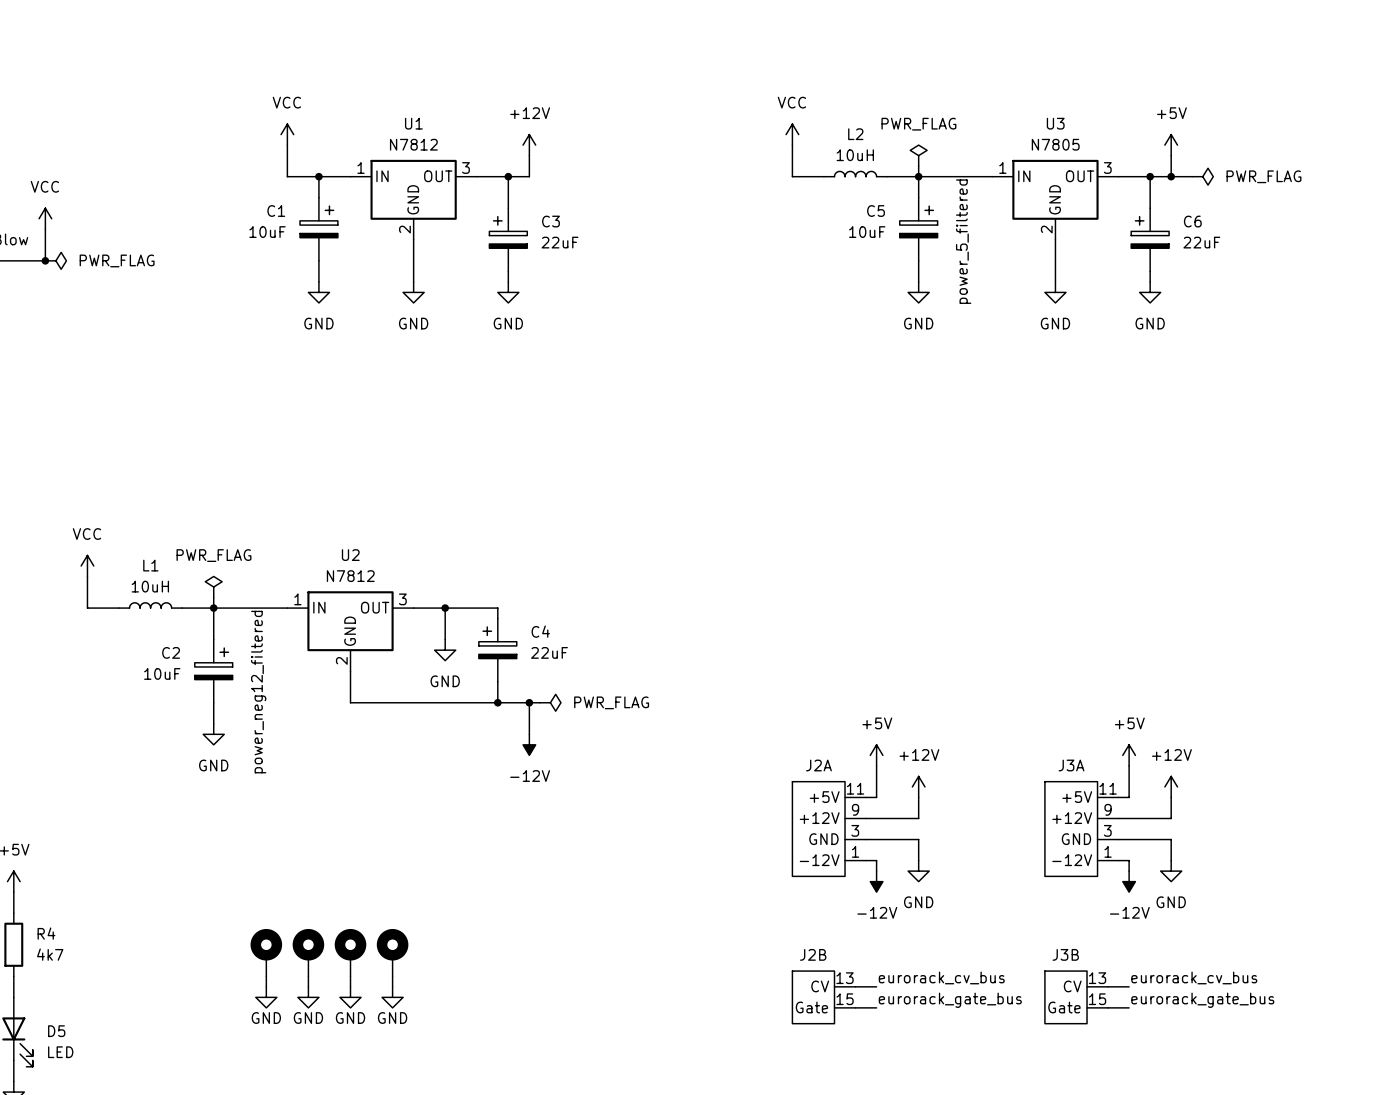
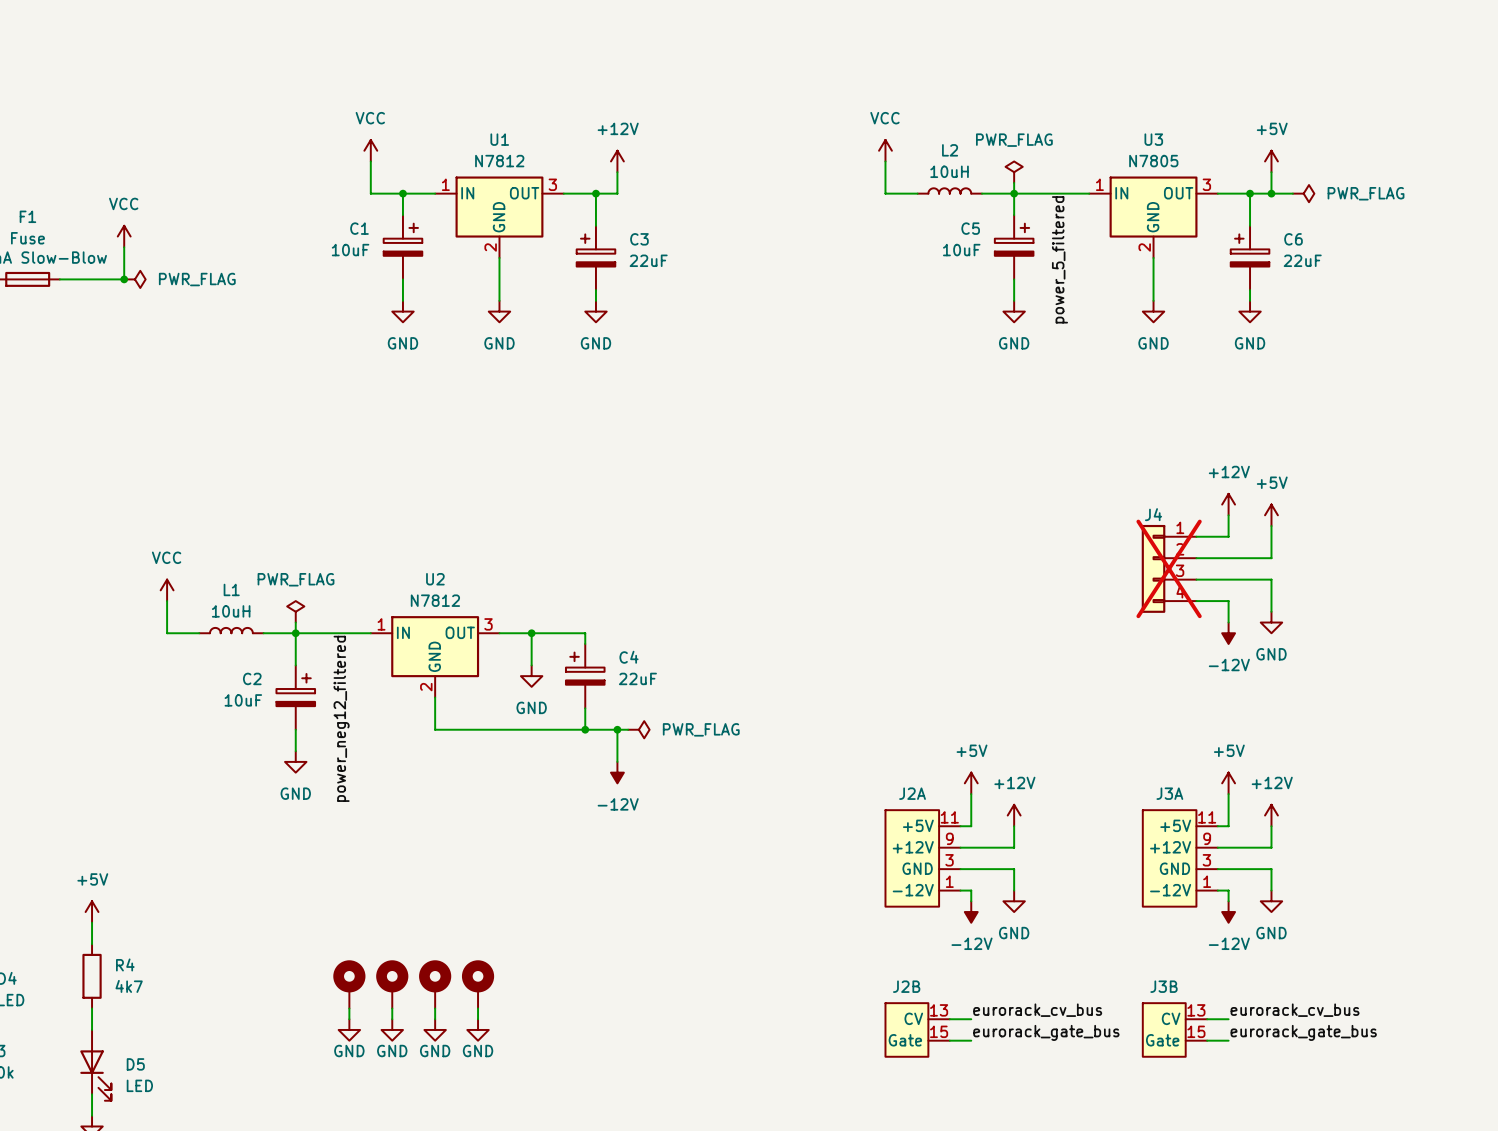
power symbol: none -> +12V (1228, 504)
wire: none -> (1228, 515) (1228, 536) (1196, 536)
power symbol: none -> +5V (1271, 515)
wire: none -> (1271, 526) (1271, 558) (1196, 558)
J4: none -> (1169, 568)
wire: none -> (1196, 579) (1271, 579) (1271, 611)
wire: none -> (1196, 601) (1228, 601) (1228, 622)
power symbol: none -> GND (1271, 622)
power symbol: none -> -12V (1228, 633)

